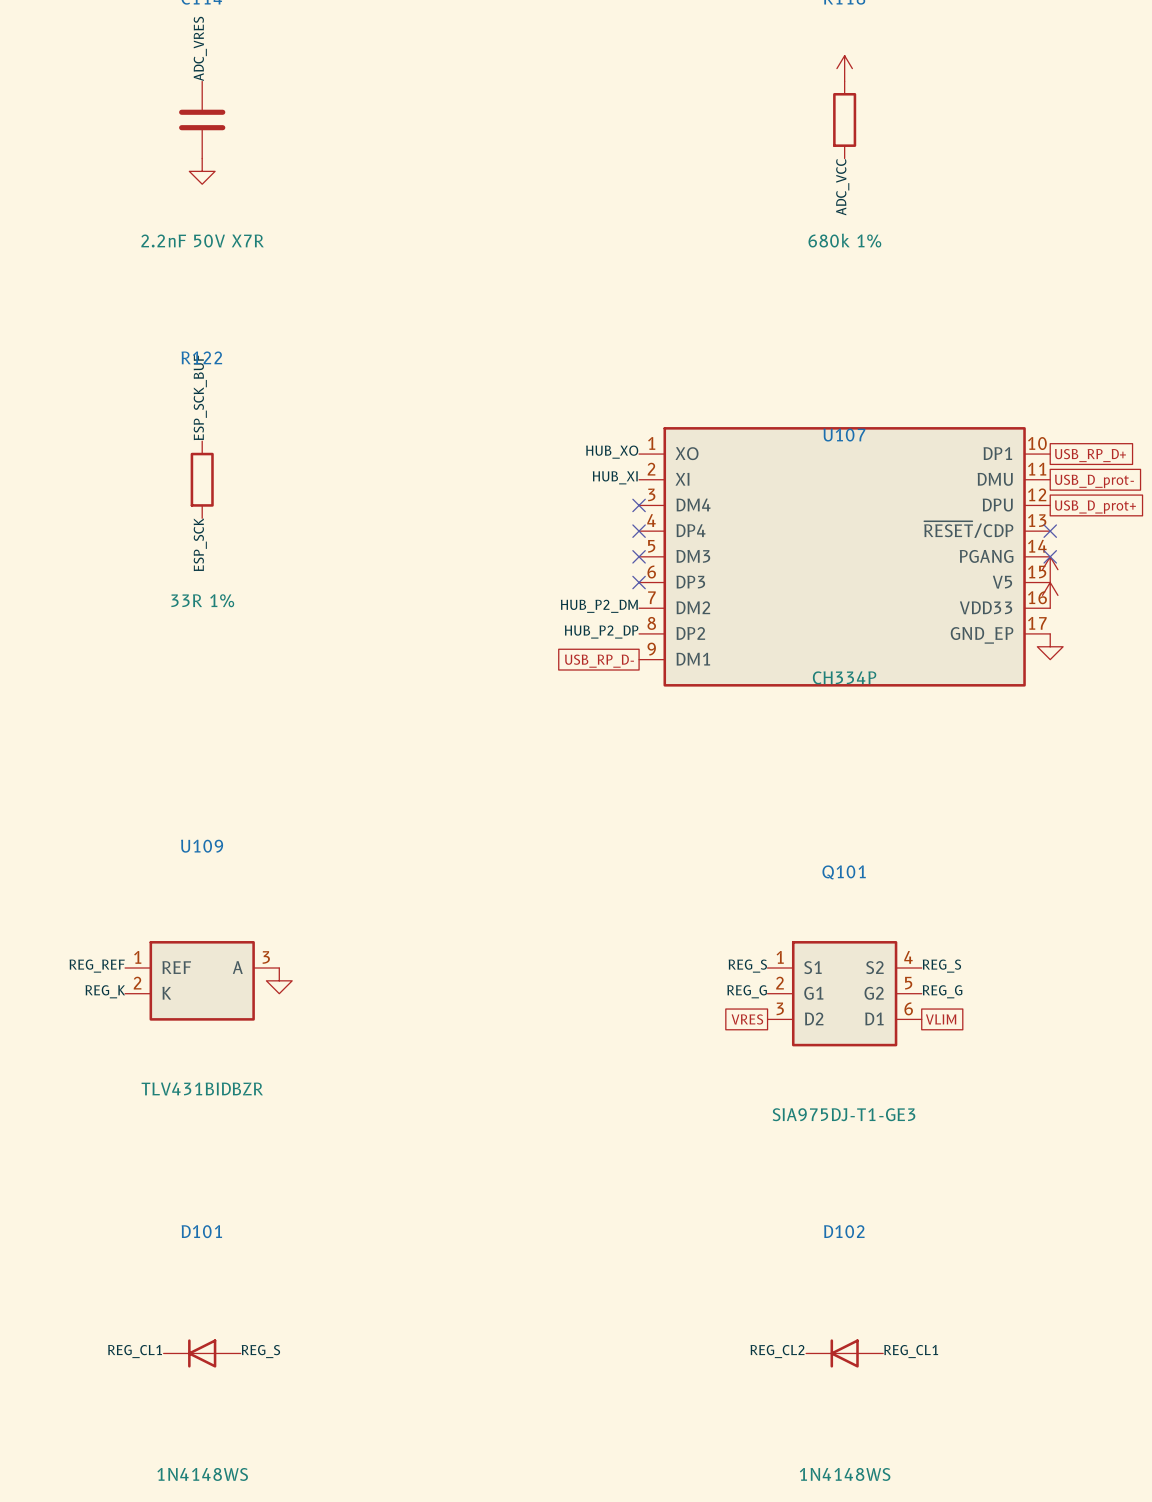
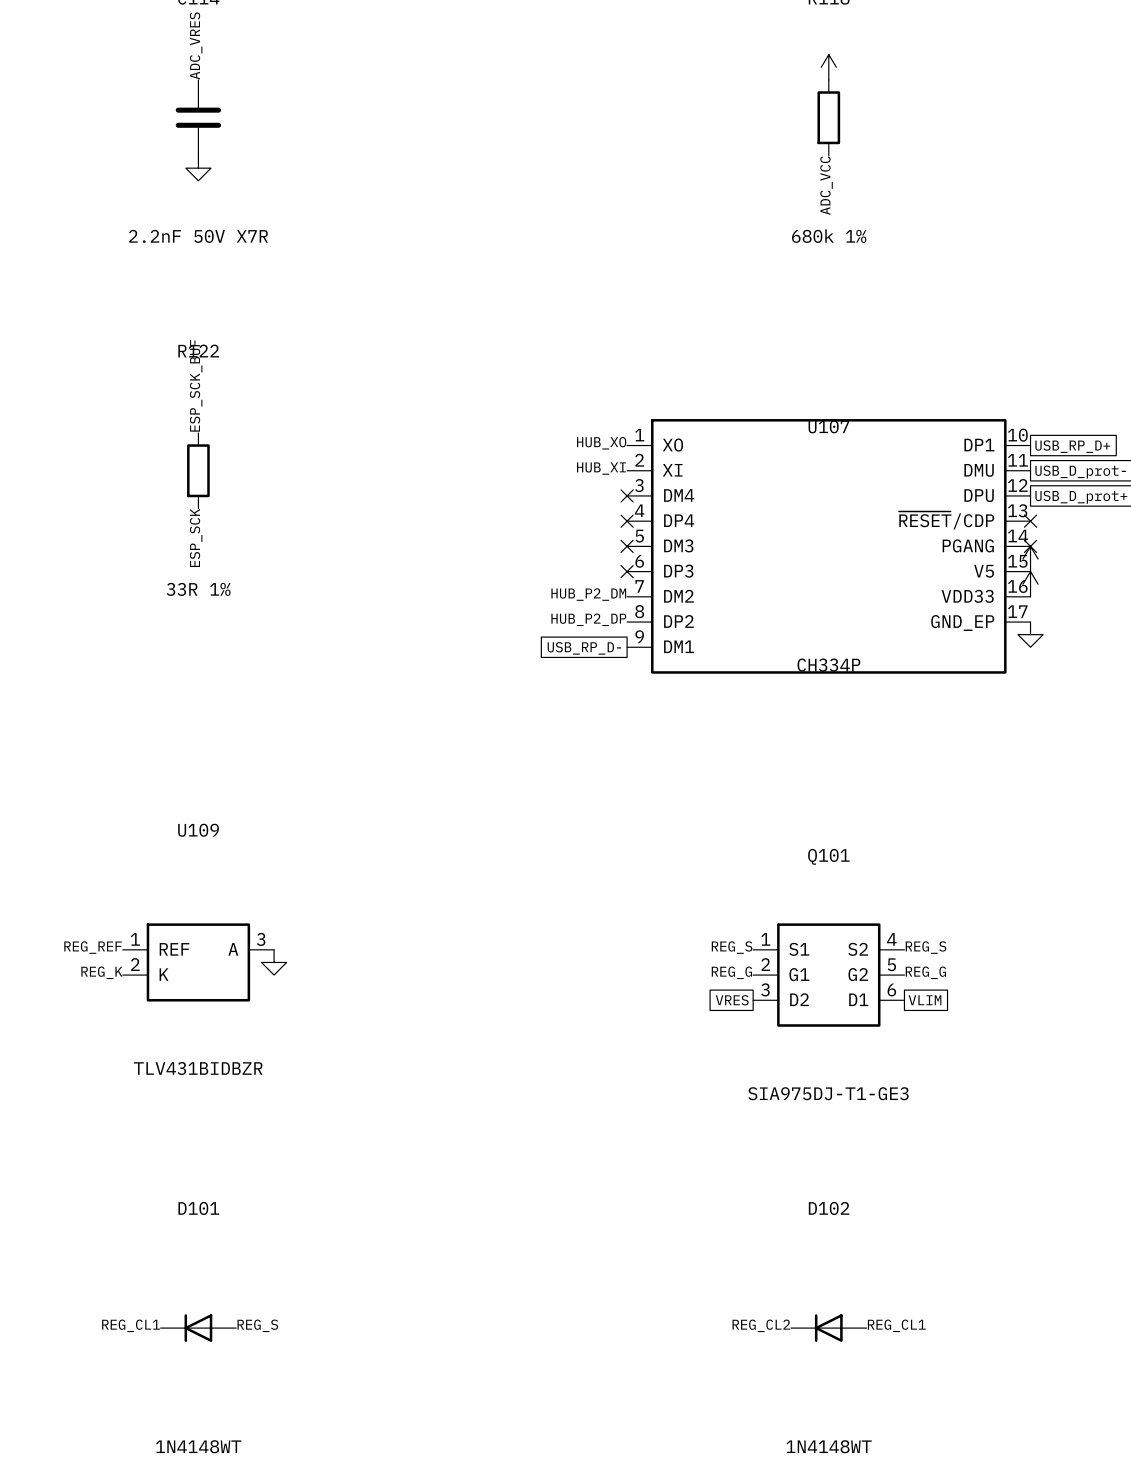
D101 value: 1N4148WS (202, 1474) -> 1N4148WT (198, 1446)
D102 value: 1N4148WS (845, 1474) -> 1N4148WT (829, 1446)

